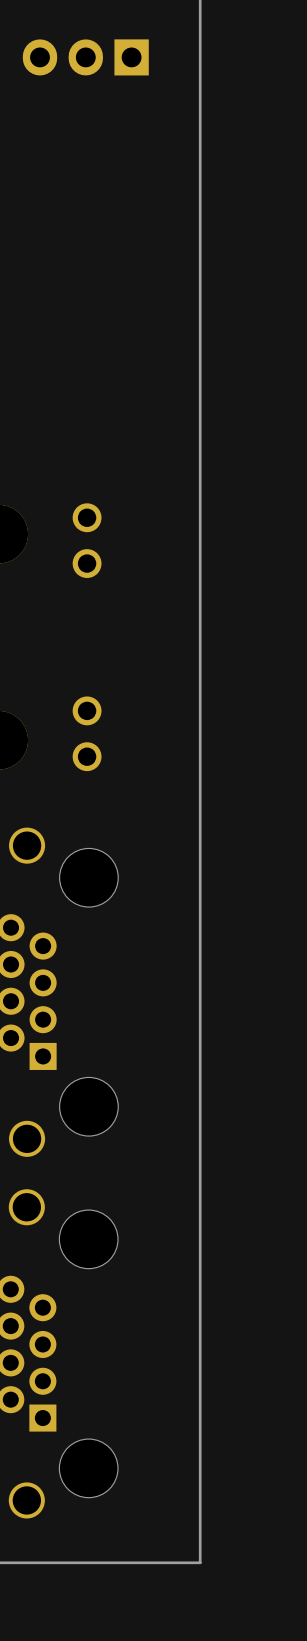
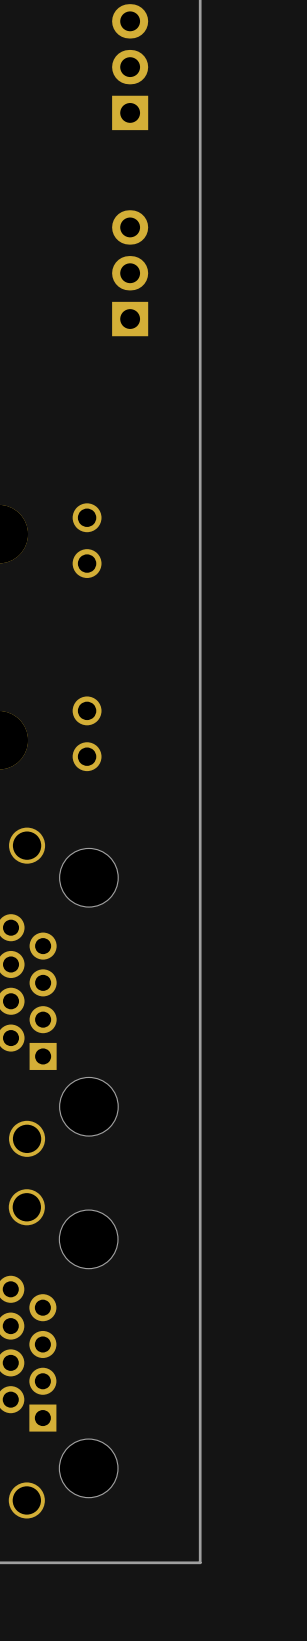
part rotation: 0° (85, 57) -> 90° clockwise (130, 67)
part: none -> (130, 273)

